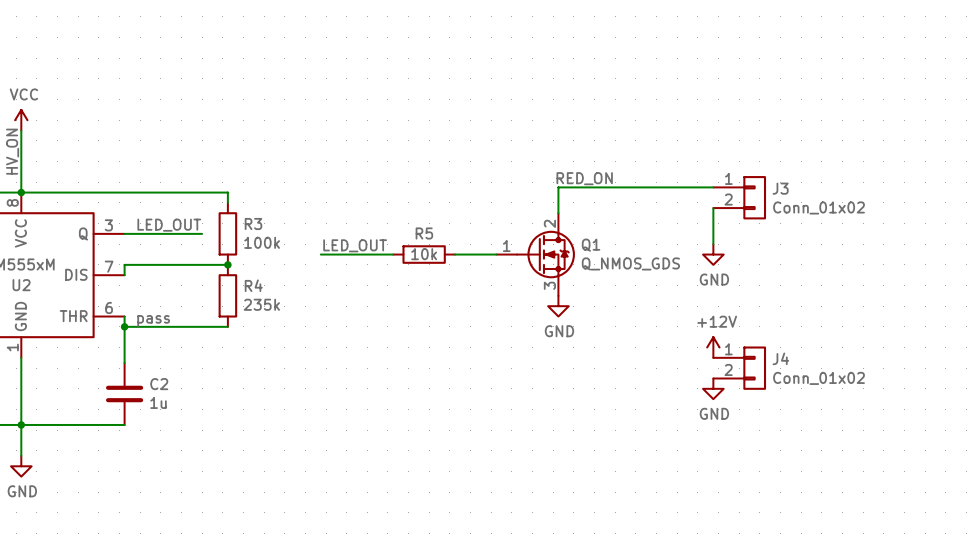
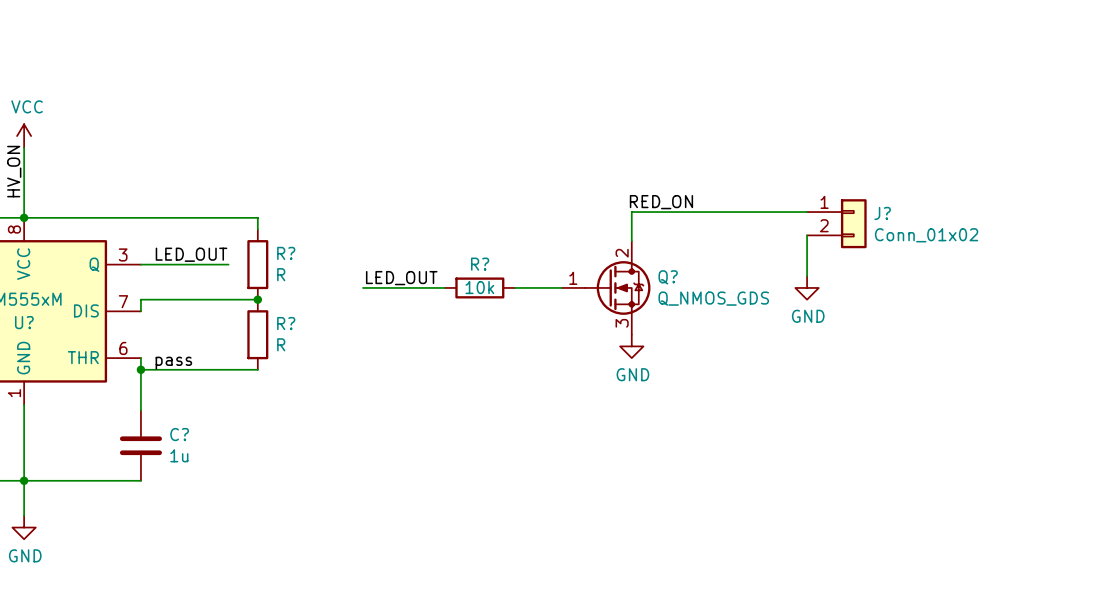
J3 name: J3 (780, 188) -> J? (882, 213)
R3 name: R3 (253, 223) -> R? (286, 253)
R5 name: R5 (424, 233) -> R? (480, 264)
R3 value: 100k (262, 242) -> R (281, 274)
Q1 name: Q1 (591, 245) -> Q? (668, 277)
U2 name: U2 (21, 285) -> U? (24, 322)
R4 name: R4 (253, 285) -> R? (286, 323)
R4 value: 235k (261, 304) -> R (281, 344)
power symbol: +12V (713, 347) -> none
J4: Conn_01x02 (739, 368) -> none
C2 name: C2 (159, 384) -> C? (179, 434)
power symbol: GND (713, 388) -> none

